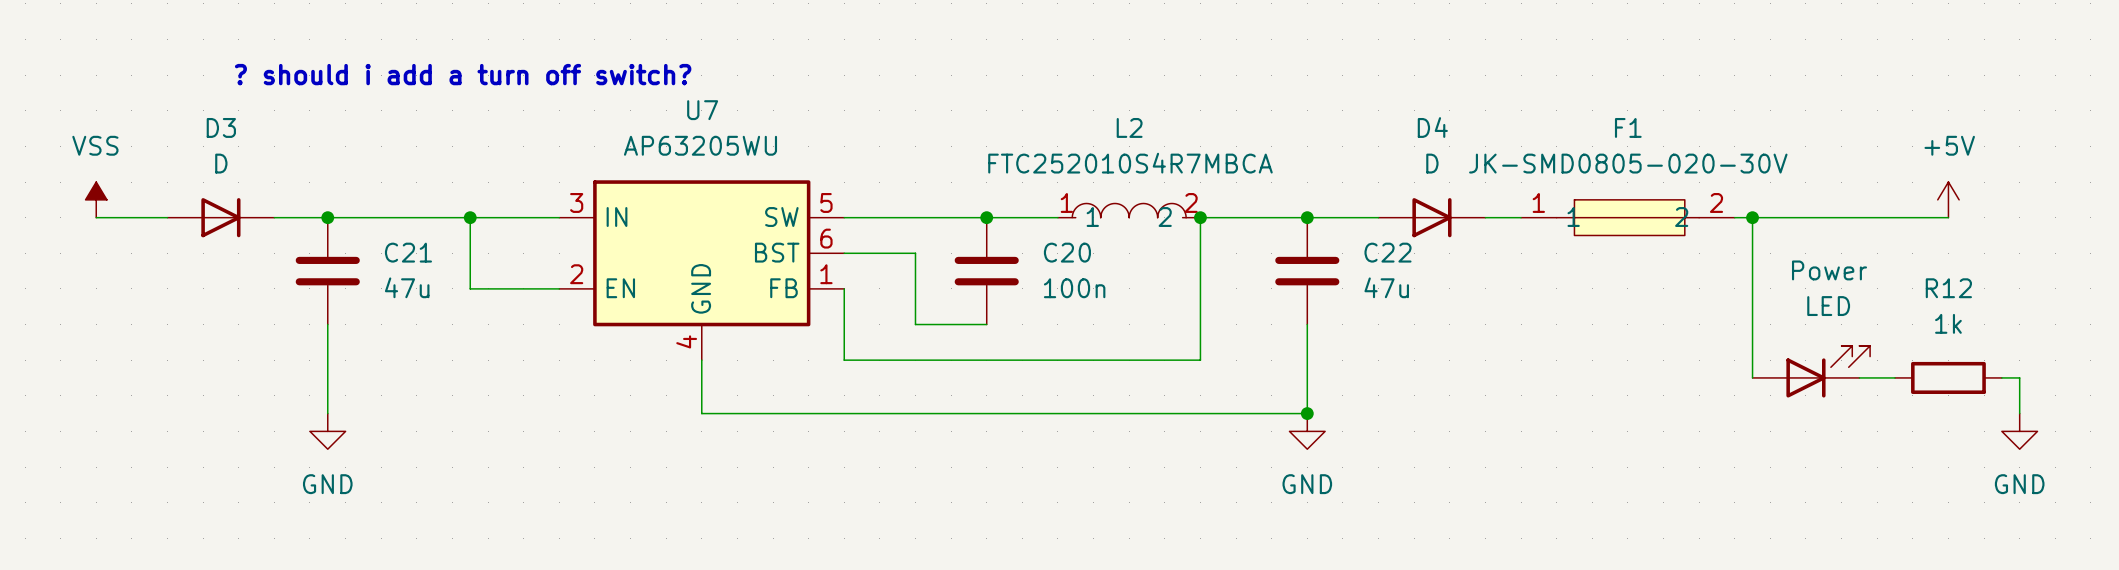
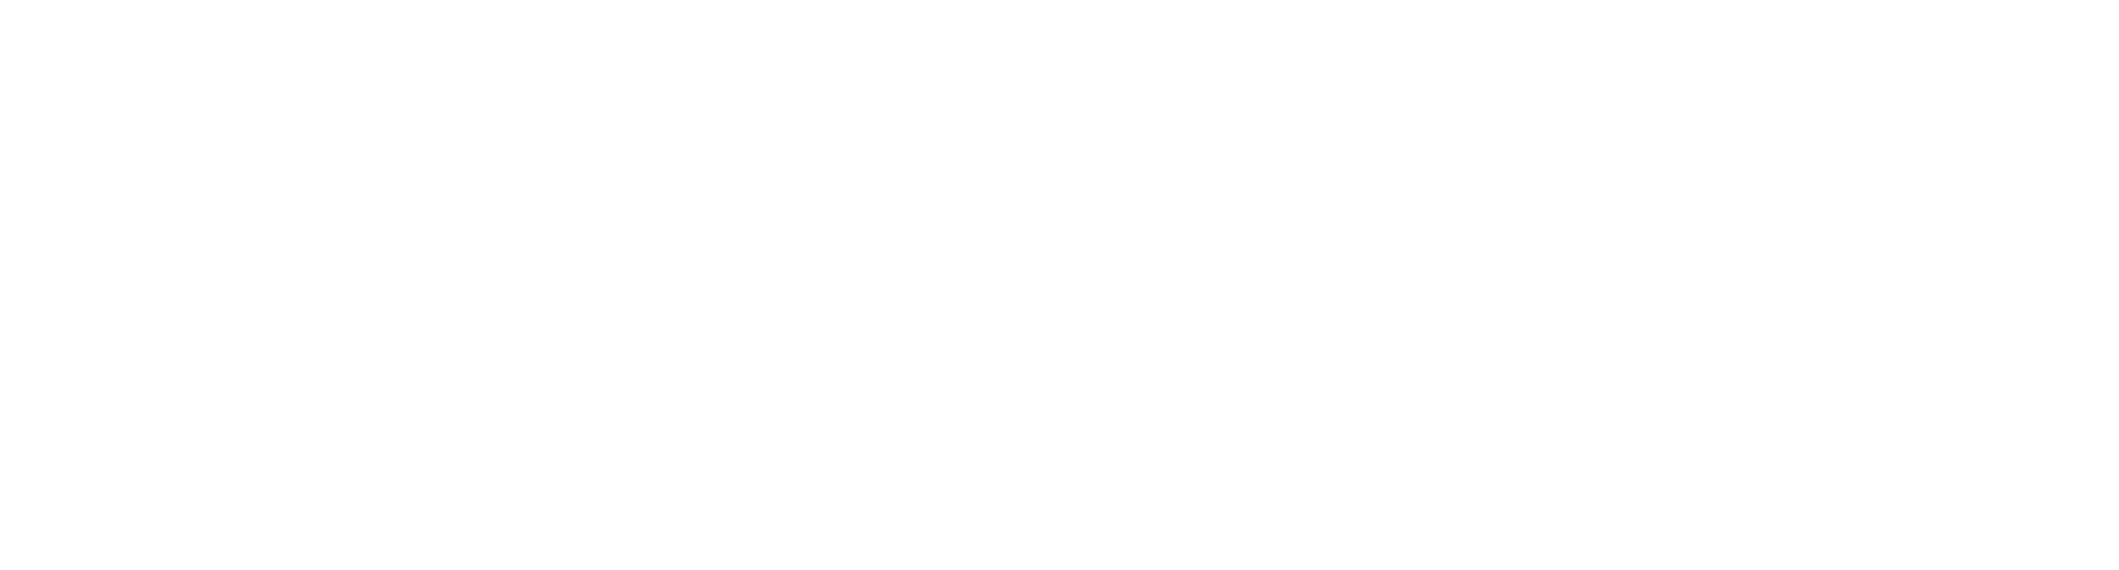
text: ? should i add a turn off switch? (463, 74) -> none
power symbol: VSS (96, 199) -> none
power symbol: +5V (1948, 199) -> none
L2: FTC252010S4R7MBCA (1129, 210) -> none
wire: (96, 217) (167, 217) -> none
D3: D (220, 217) -> none
wire: (274, 217) (559, 217) -> none
junction: (327, 217) -> none
wire: (470, 217) (470, 288) (559, 288) -> none
junction: (470, 217) -> none
wire: (844, 217) (1057, 217) -> none
junction: (986, 217) -> none
junction: (1200, 217) -> none
junction: (1307, 217) -> none
wire: (1378, 217) (1200, 217) (1200, 360) (844, 360) (844, 288) -> none
D4: D (1431, 217) -> none
wire: (1485, 217) (1521, 217) -> none
F1: JK-SMD0805-020-30V (1627, 217) -> none
wire: (1734, 217) (1948, 217) -> none
wire: (1752, 217) (1752, 377) -> none
junction: (1752, 217) -> none
wire: (844, 253) (915, 253) (915, 324) (986, 324) -> none
U7: AP63205WU (701, 270) -> none
C21: 47u (327, 271) -> none
C20: 100n (986, 271) -> none
C22: 47u (1307, 271) -> none
wire: (327, 324) (327, 413) -> none
wire: (1307, 324) (1307, 413) (701, 413) (701, 360) -> none
Power: LED (1811, 371) -> none
wire: (1859, 377) (1895, 377) -> none
R12: 1k (1948, 377) -> none
wire: (2001, 377) (2019, 377) (2019, 413) -> none
junction: (1307, 413) -> none
power symbol: GND (327, 431) -> none
power symbol: GND (1307, 431) -> none
power symbol: GND (2019, 431) -> none

